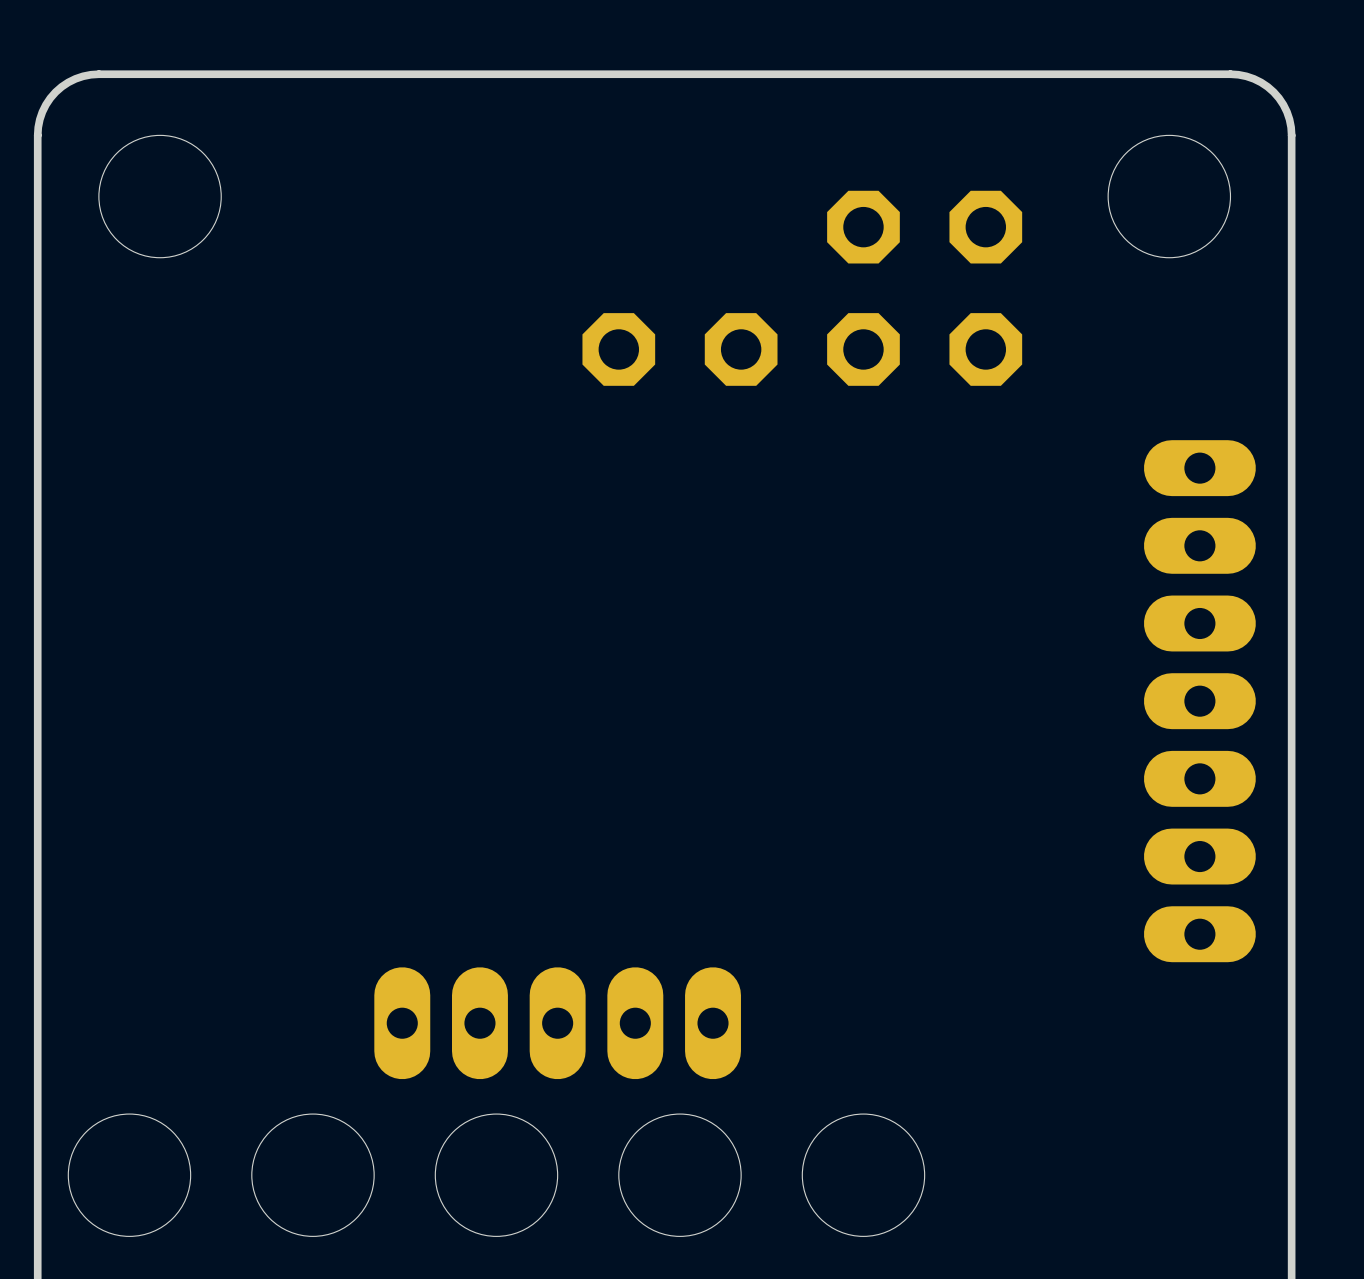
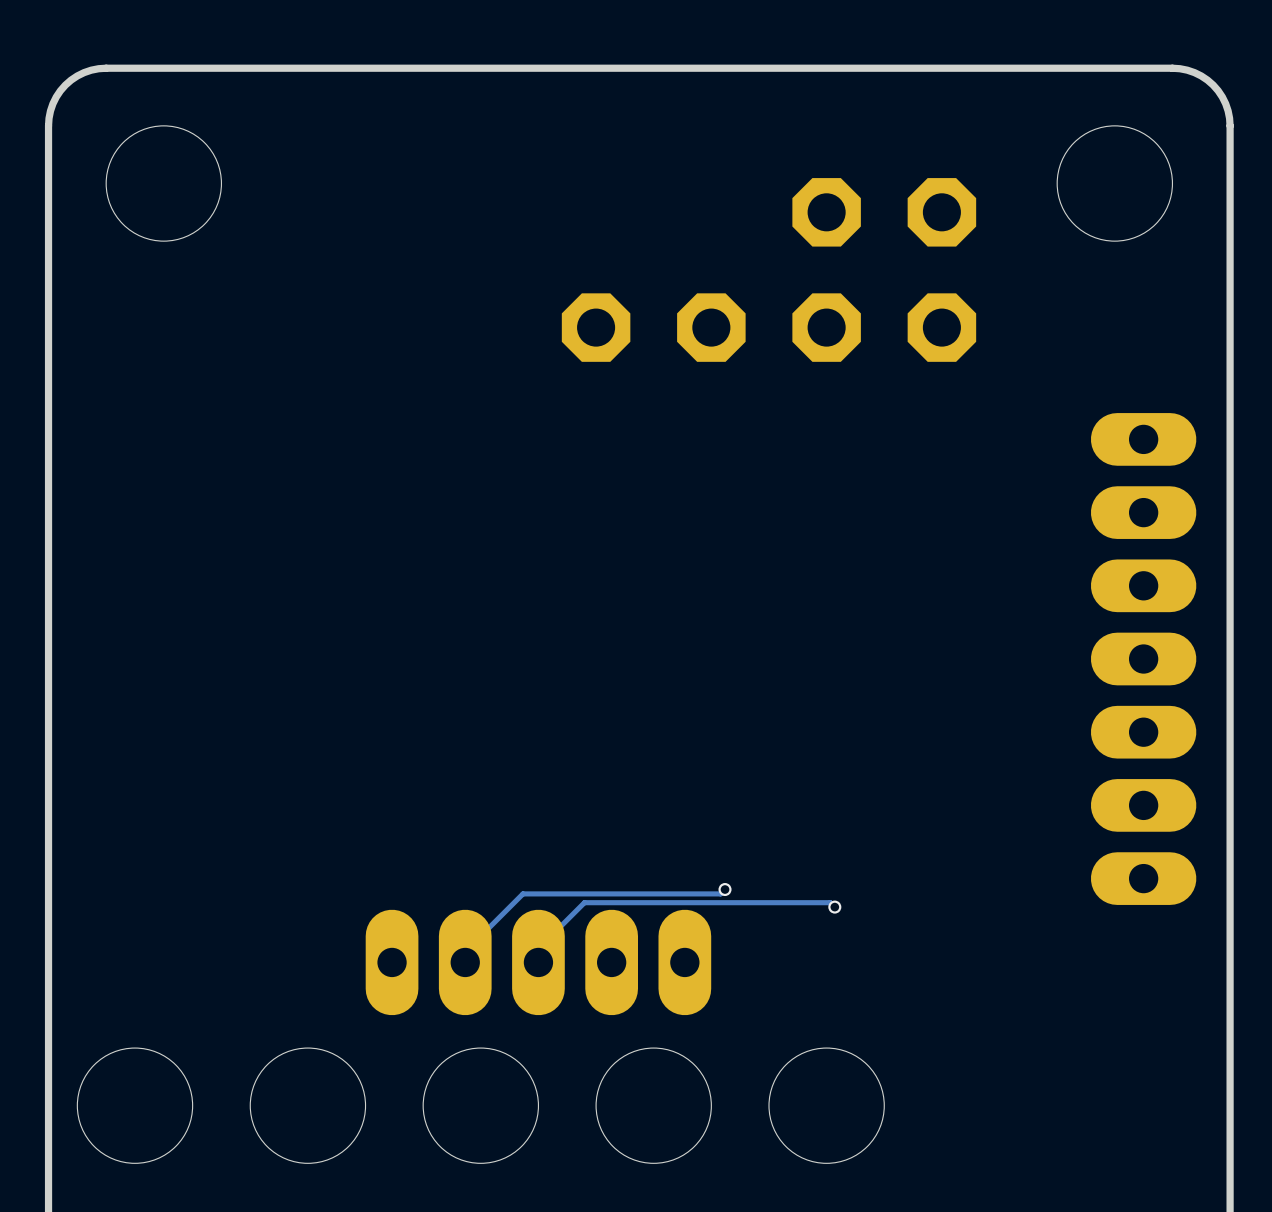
track: none -> (725, 889) (720, 893) (522, 893) (465, 951) (465, 962)
via: none -> (725, 889)
track: none -> (834, 907) (830, 902) (584, 902) (540, 946) (540, 959) (538, 962)
via: none -> (834, 907)

